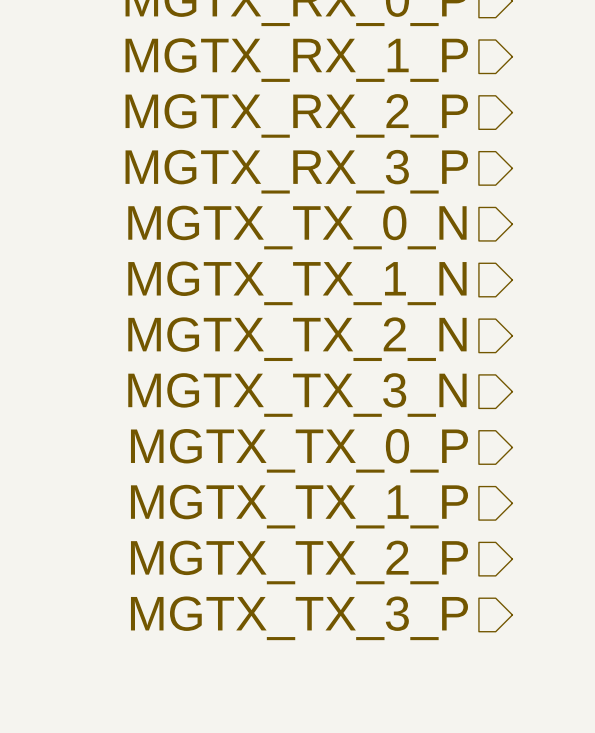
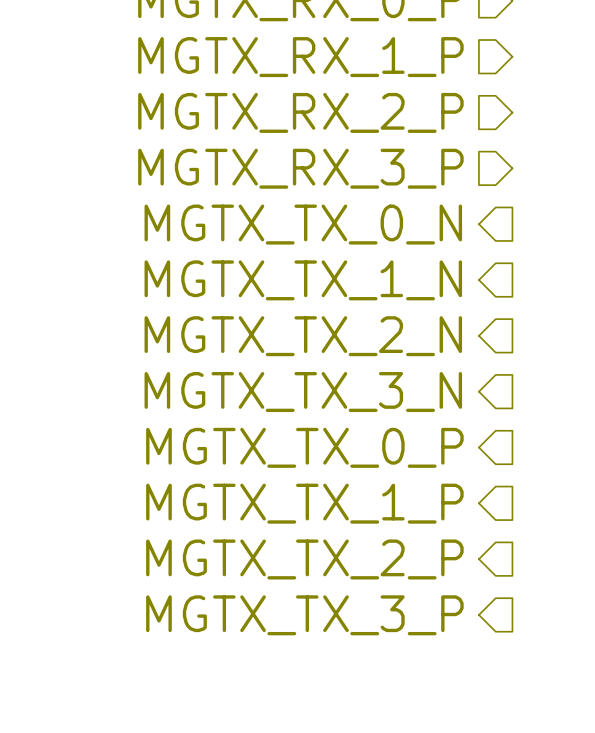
hierarchical label shape: input (297, 227) -> output (303, 224)
hierarchical label shape: input (297, 283) -> output (303, 280)
hierarchical label shape: input (297, 339) -> output (303, 336)
hierarchical label shape: input (297, 395) -> output (303, 392)
hierarchical label shape: input (299, 450) -> output (304, 447)
hierarchical label shape: input (299, 506) -> output (304, 503)
hierarchical label shape: input (299, 562) -> output (304, 559)
hierarchical label shape: input (299, 618) -> output (304, 615)

